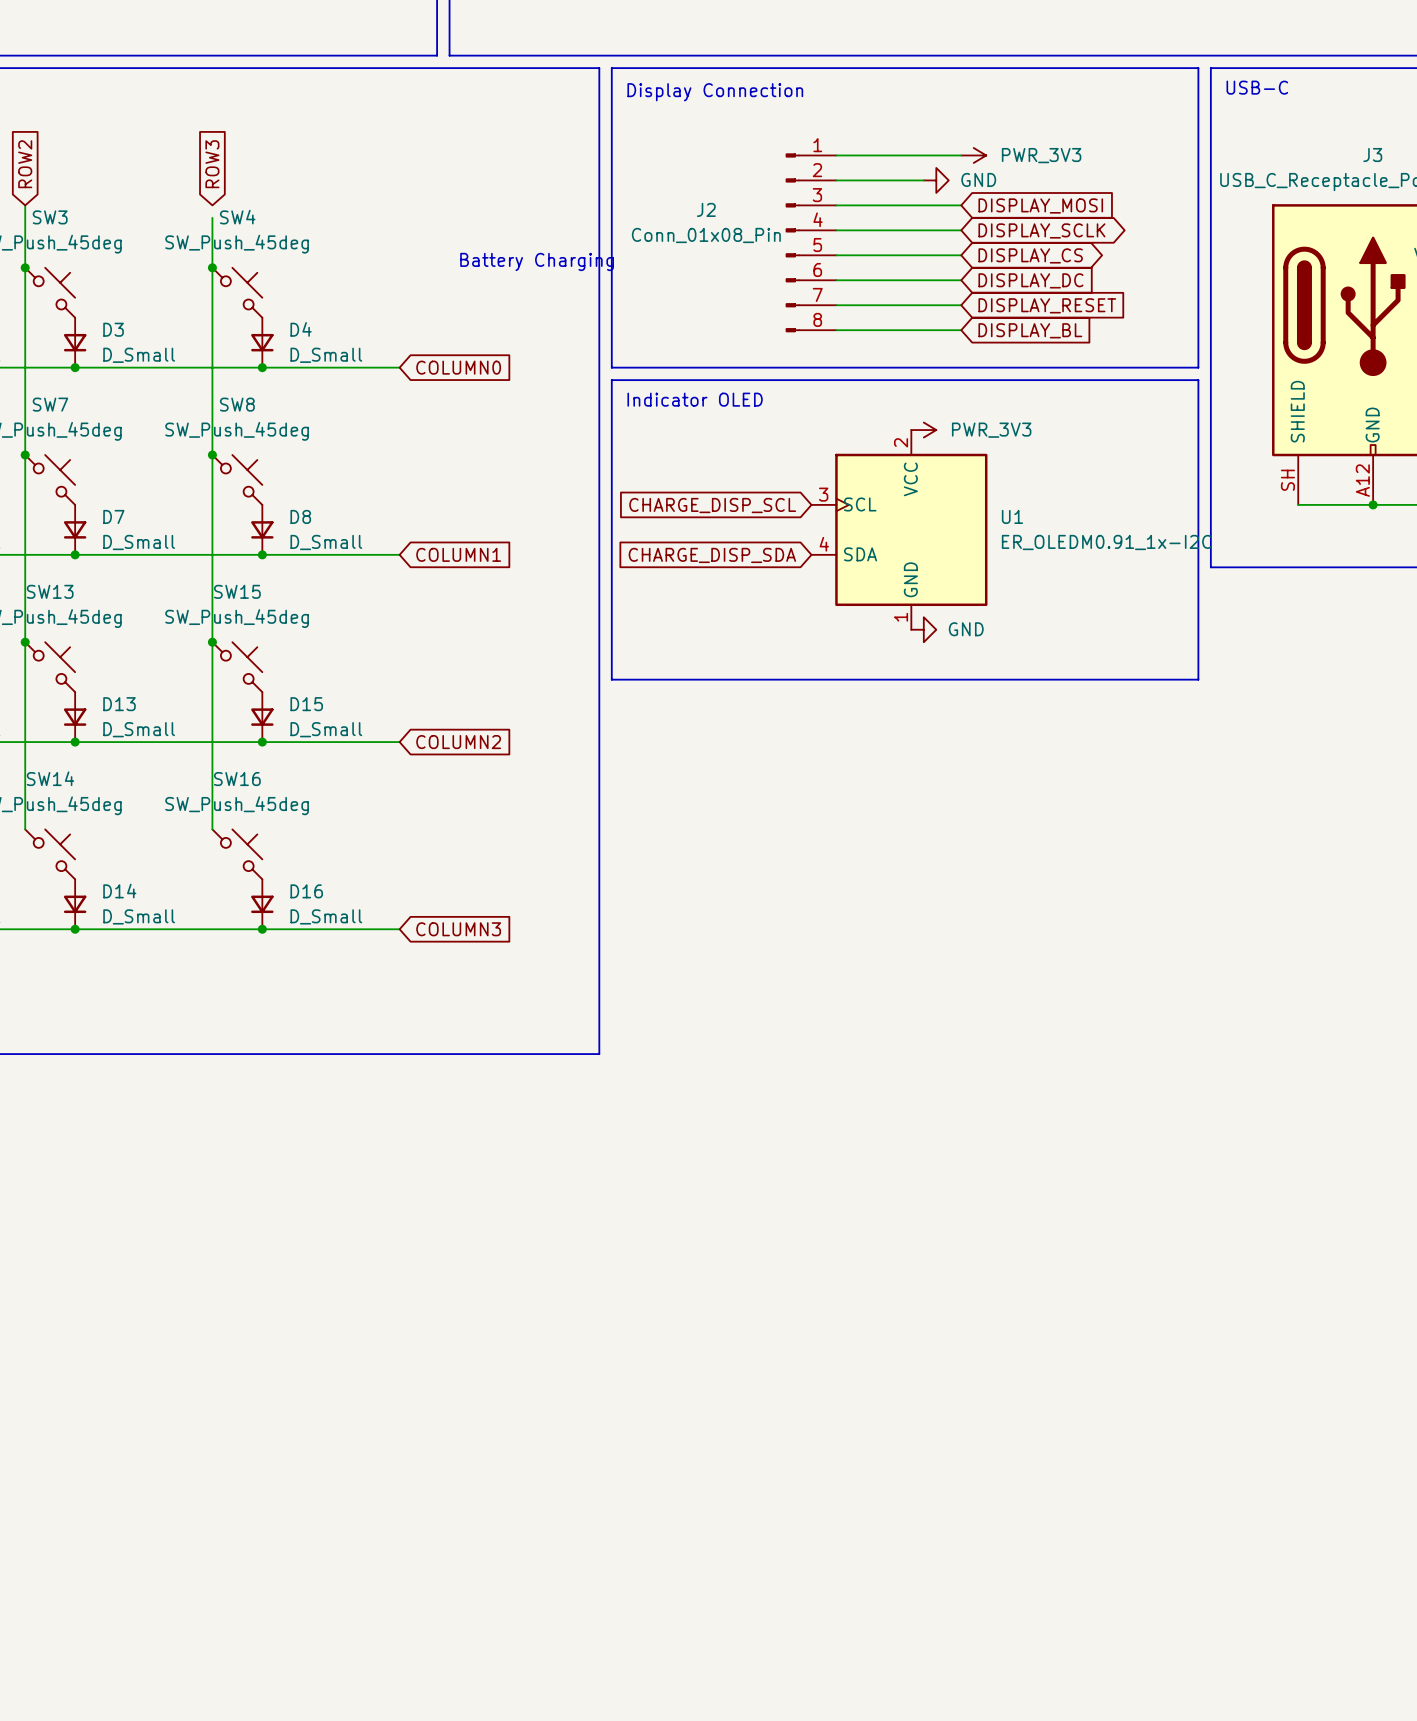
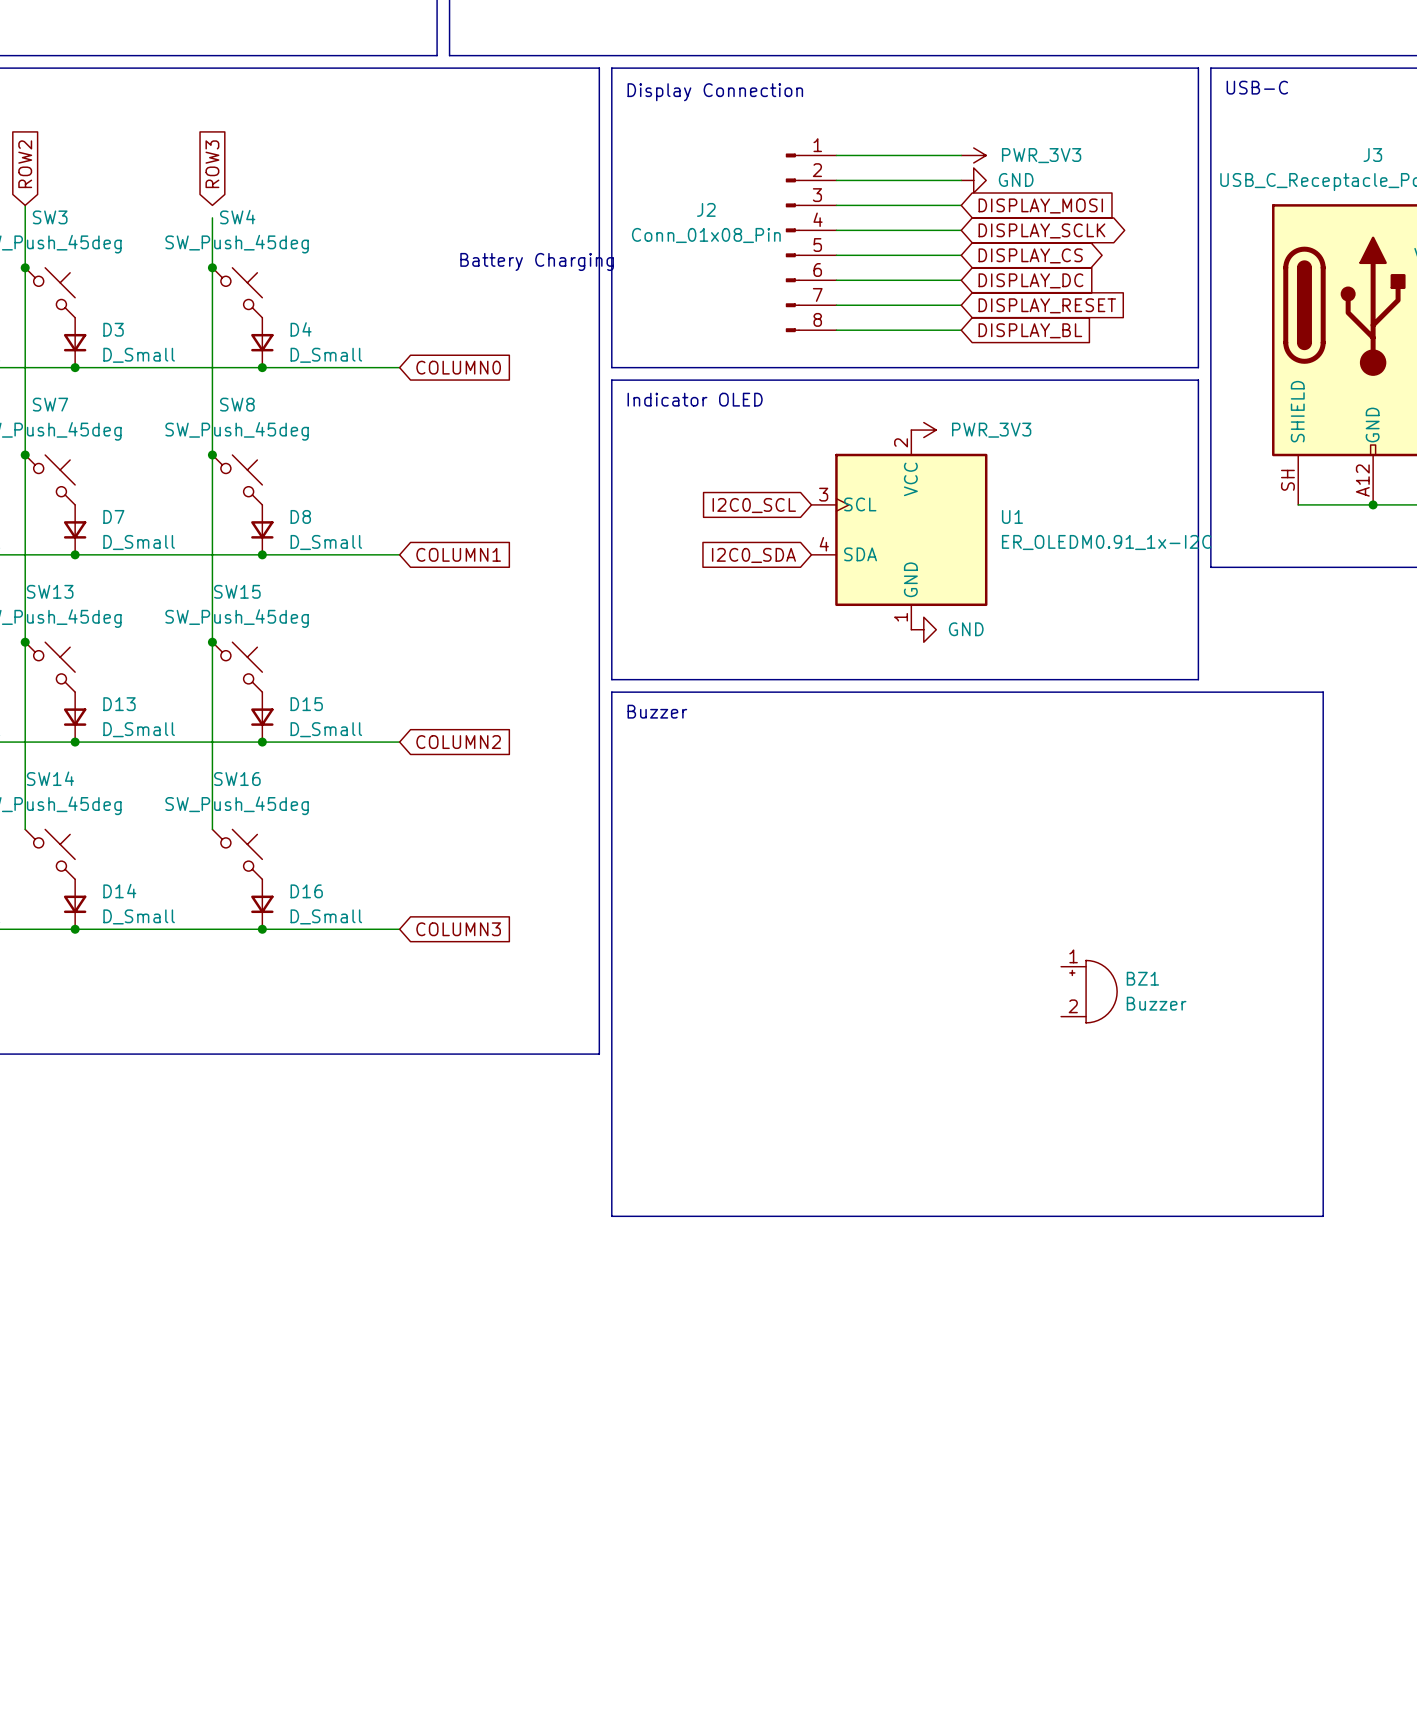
wire: none -> (923, 180) (961, 180)
power symbol position: GND (936, 180) -> GND (973, 180)
global label: CHARGE_DISP_SCL (712, 505) -> I2C0_SCL (754, 505)
global label: CHARGE_DISP_SDA (712, 555) -> I2C0_SDA (753, 555)
line: none -> (611, 692) (611, 1216) (1323, 1216) (1323, 692) (611, 692)
text: none -> Buzzer (657, 711)
BZ1: none -> Buzzer (1089, 991)

